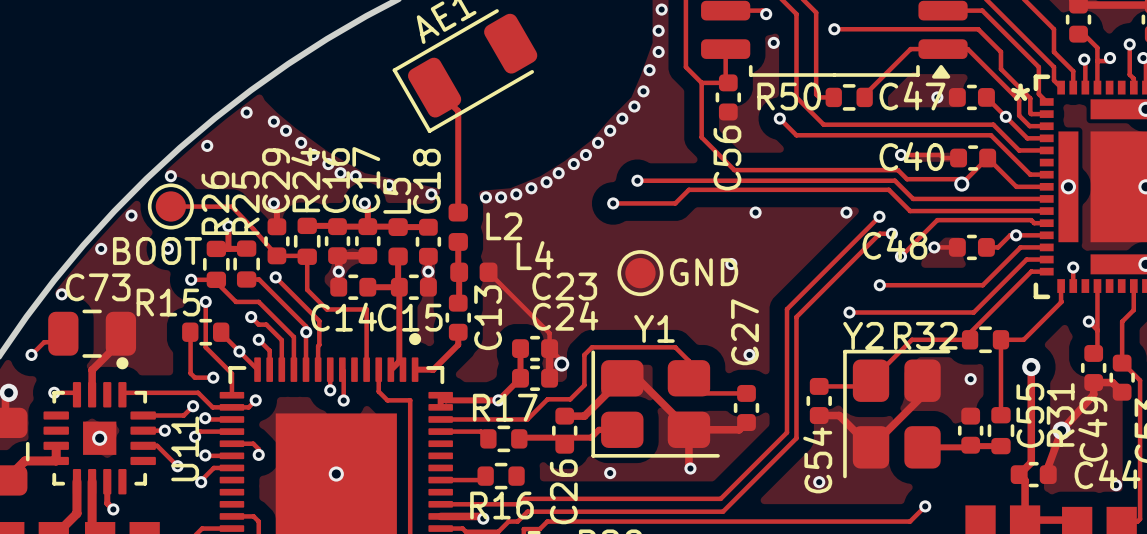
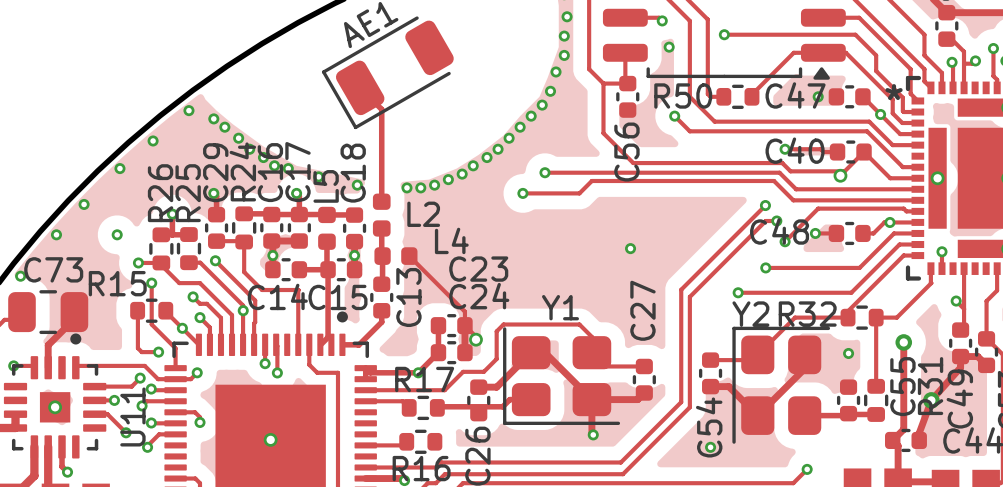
track: (170, 206) (231, 206) (276, 255) -> none
part: BOOT (170, 206) -> none
via: (755, 212) -> none
via: (846, 212) -> none
part: GND (640, 273) -> none
via: (749, 354) -> none
via: (610, 473) -> none
via: (1116, 485) -> none

